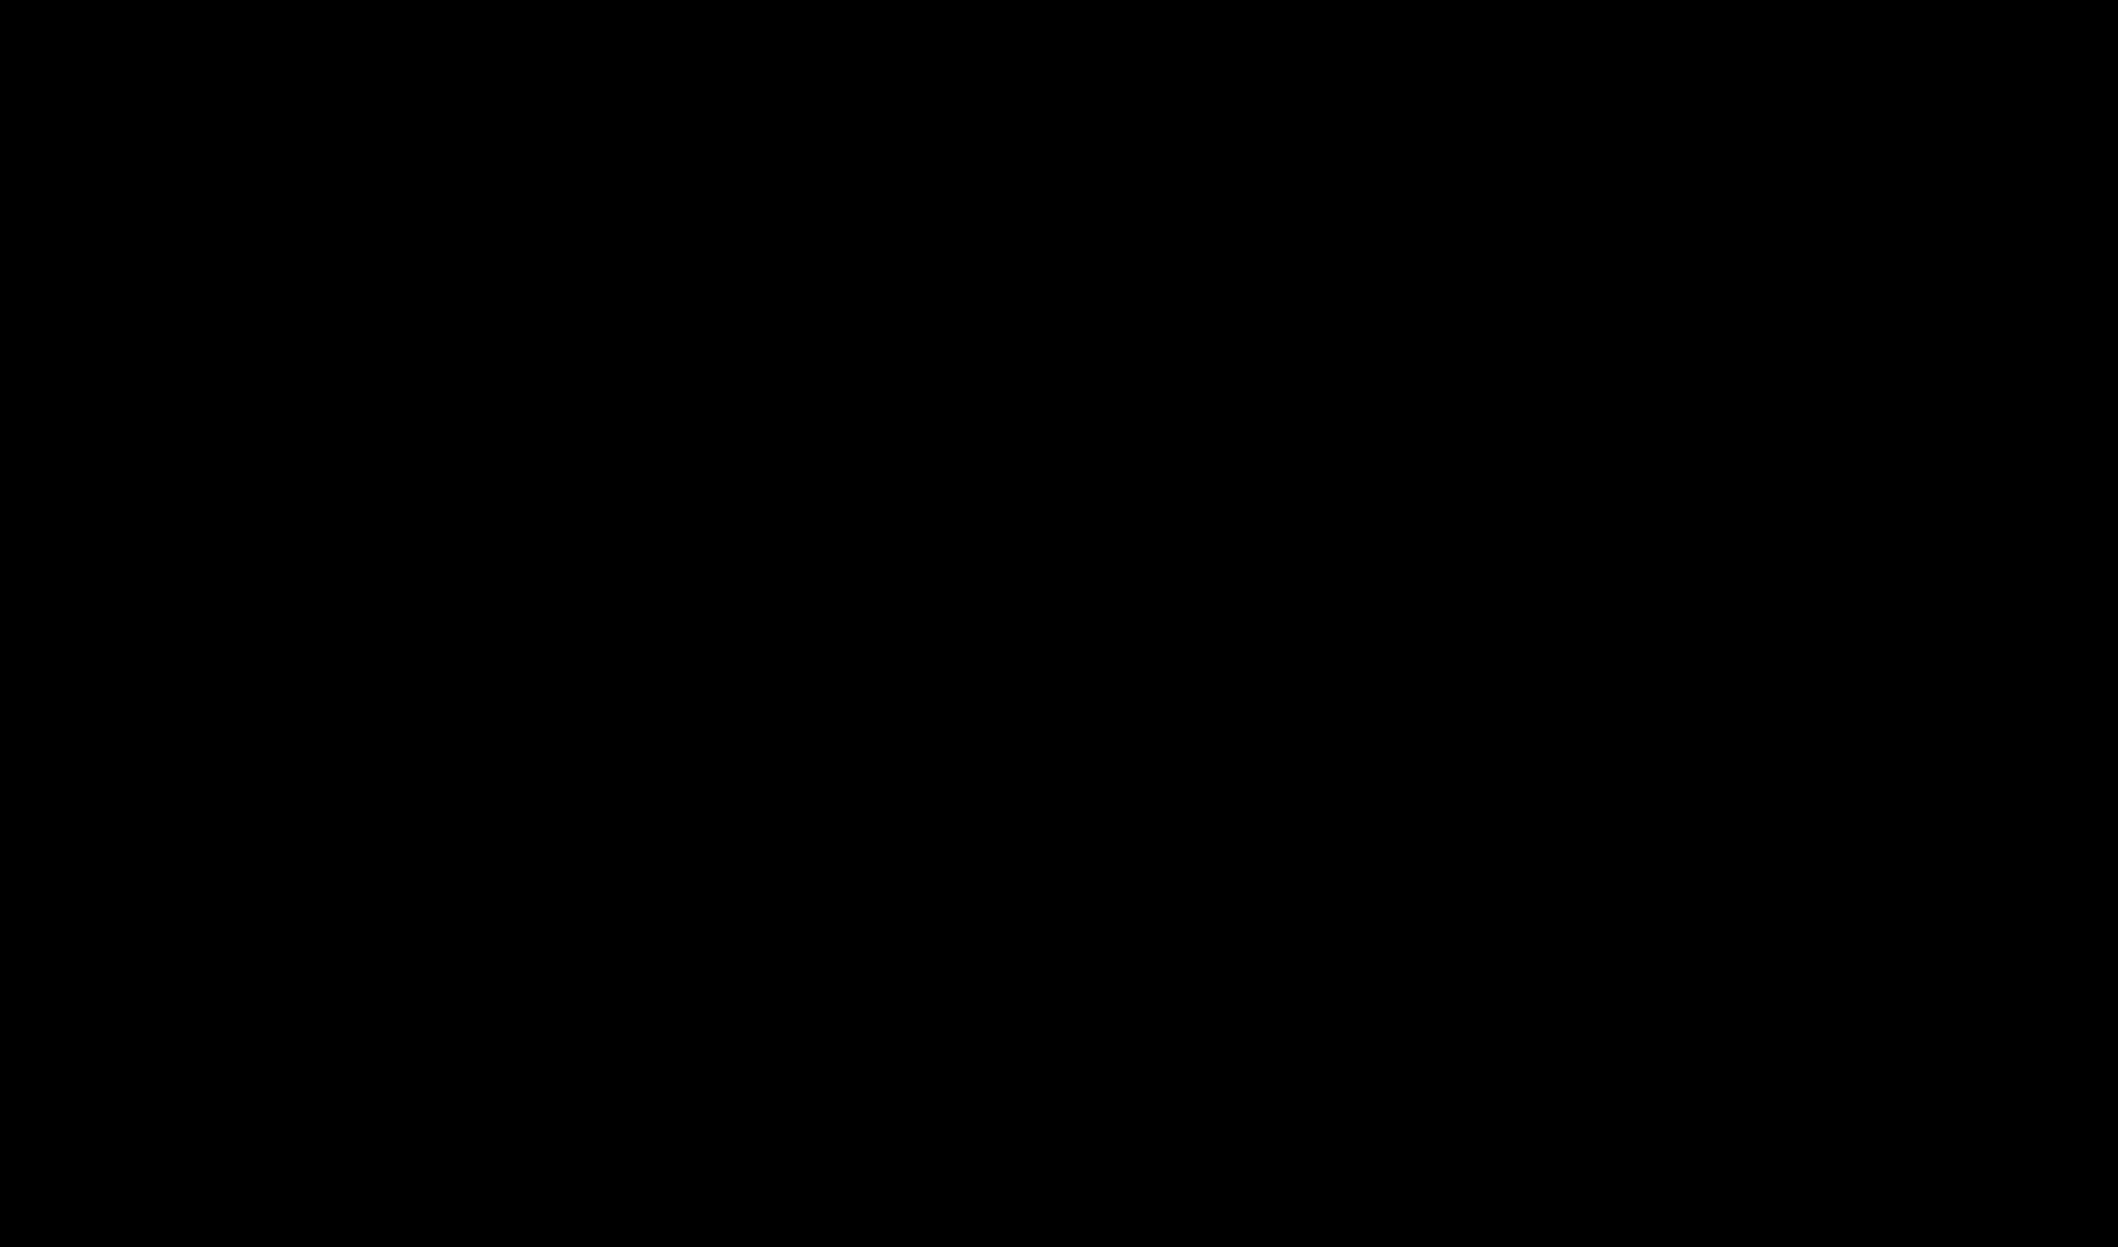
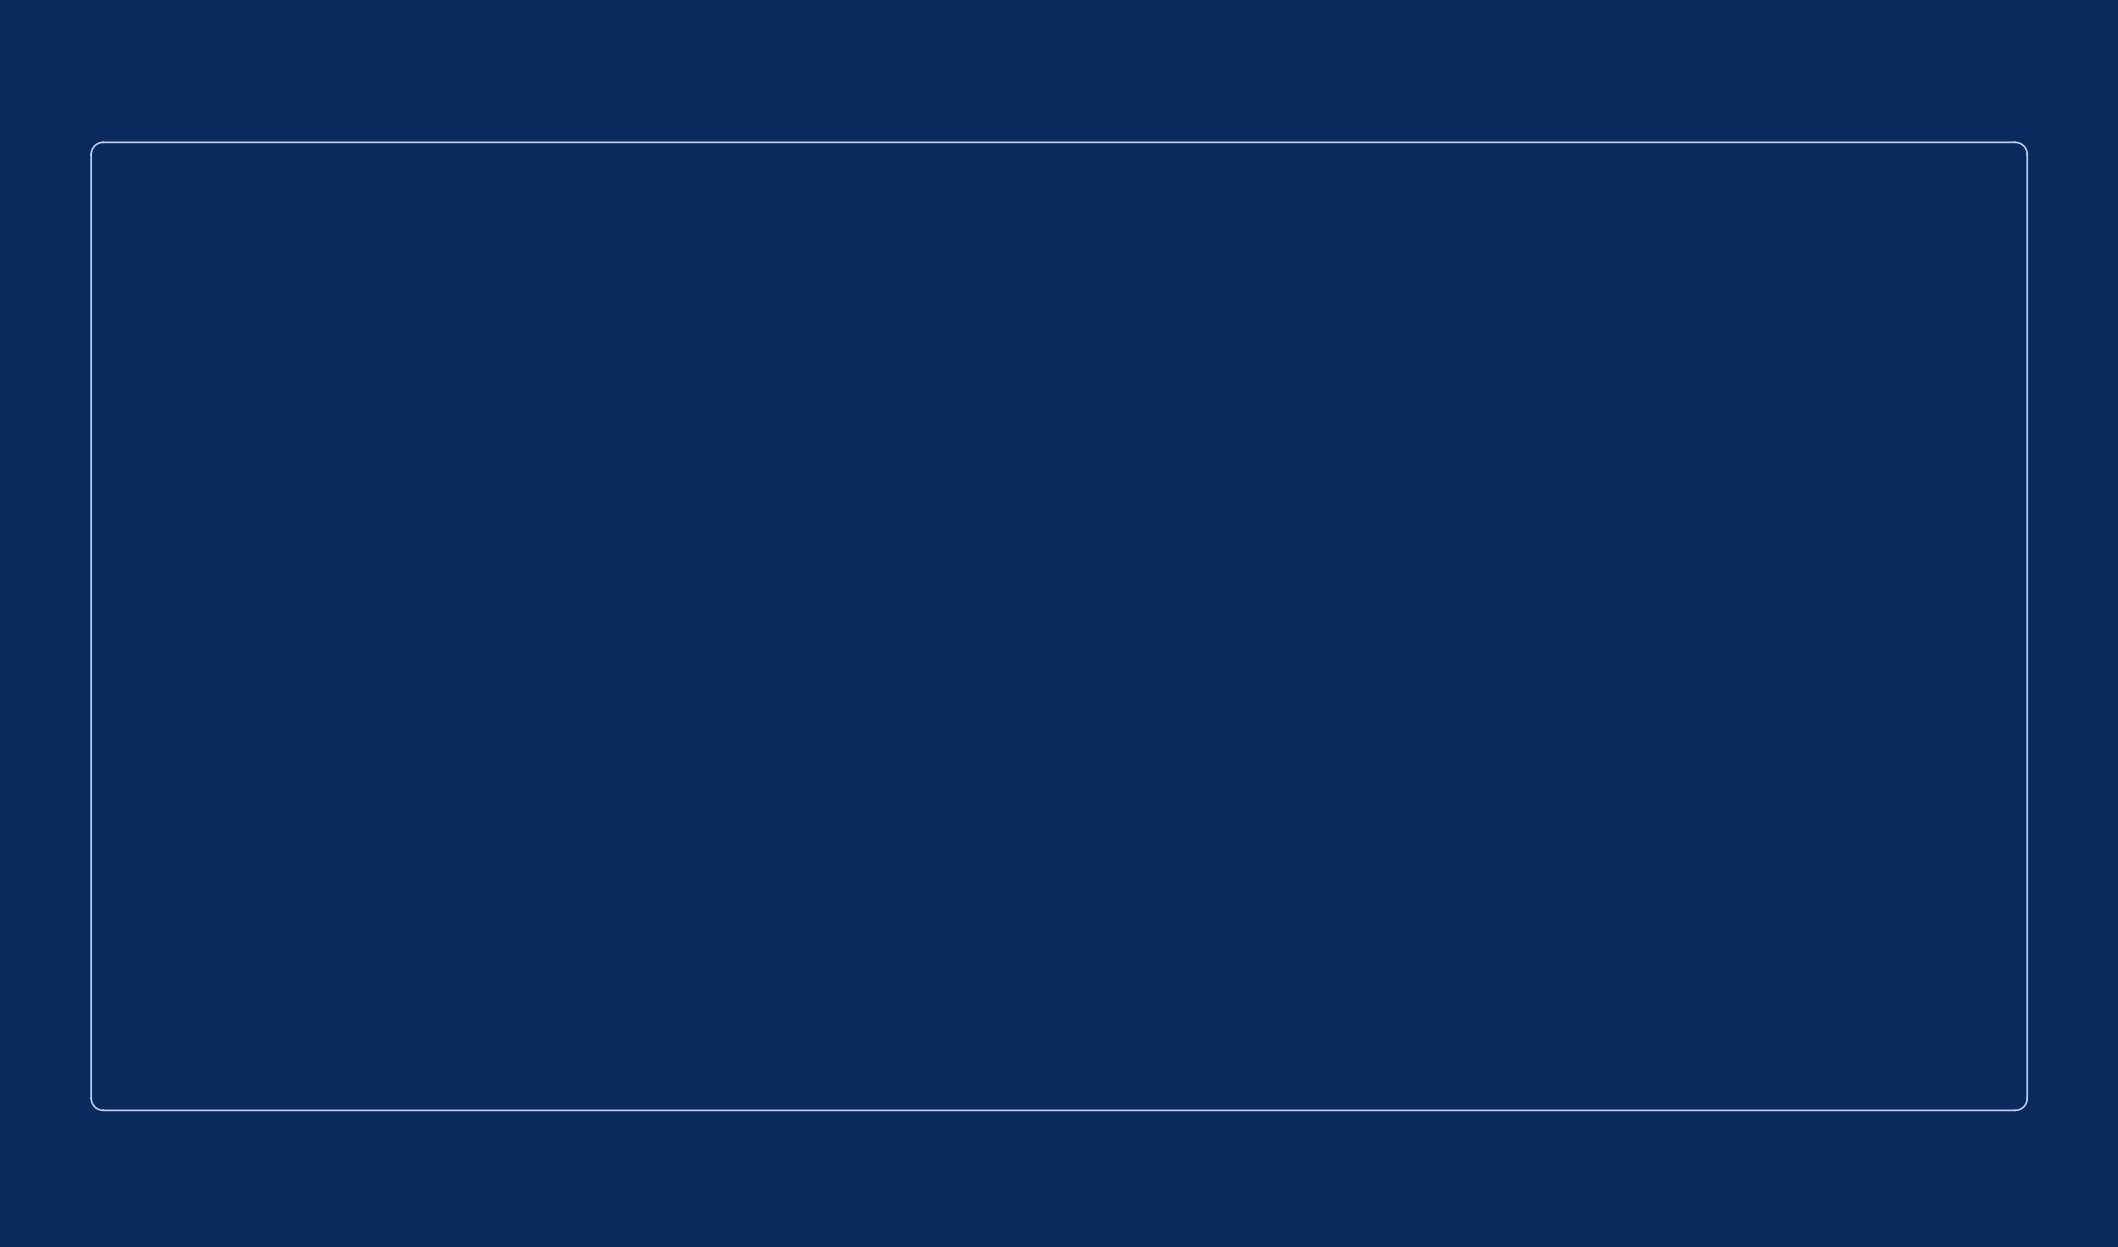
board edge: none -> (2015, 142) (103, 142) (97, 143) (92, 148) (91, 154) (91, 1098) (92, 1104) (97, 1108) (103, 1110) (2015, 1110) (2021, 1108) (2025, 1104) (2027, 1098) (2027, 154) (2023, 145) (2015, 142)

